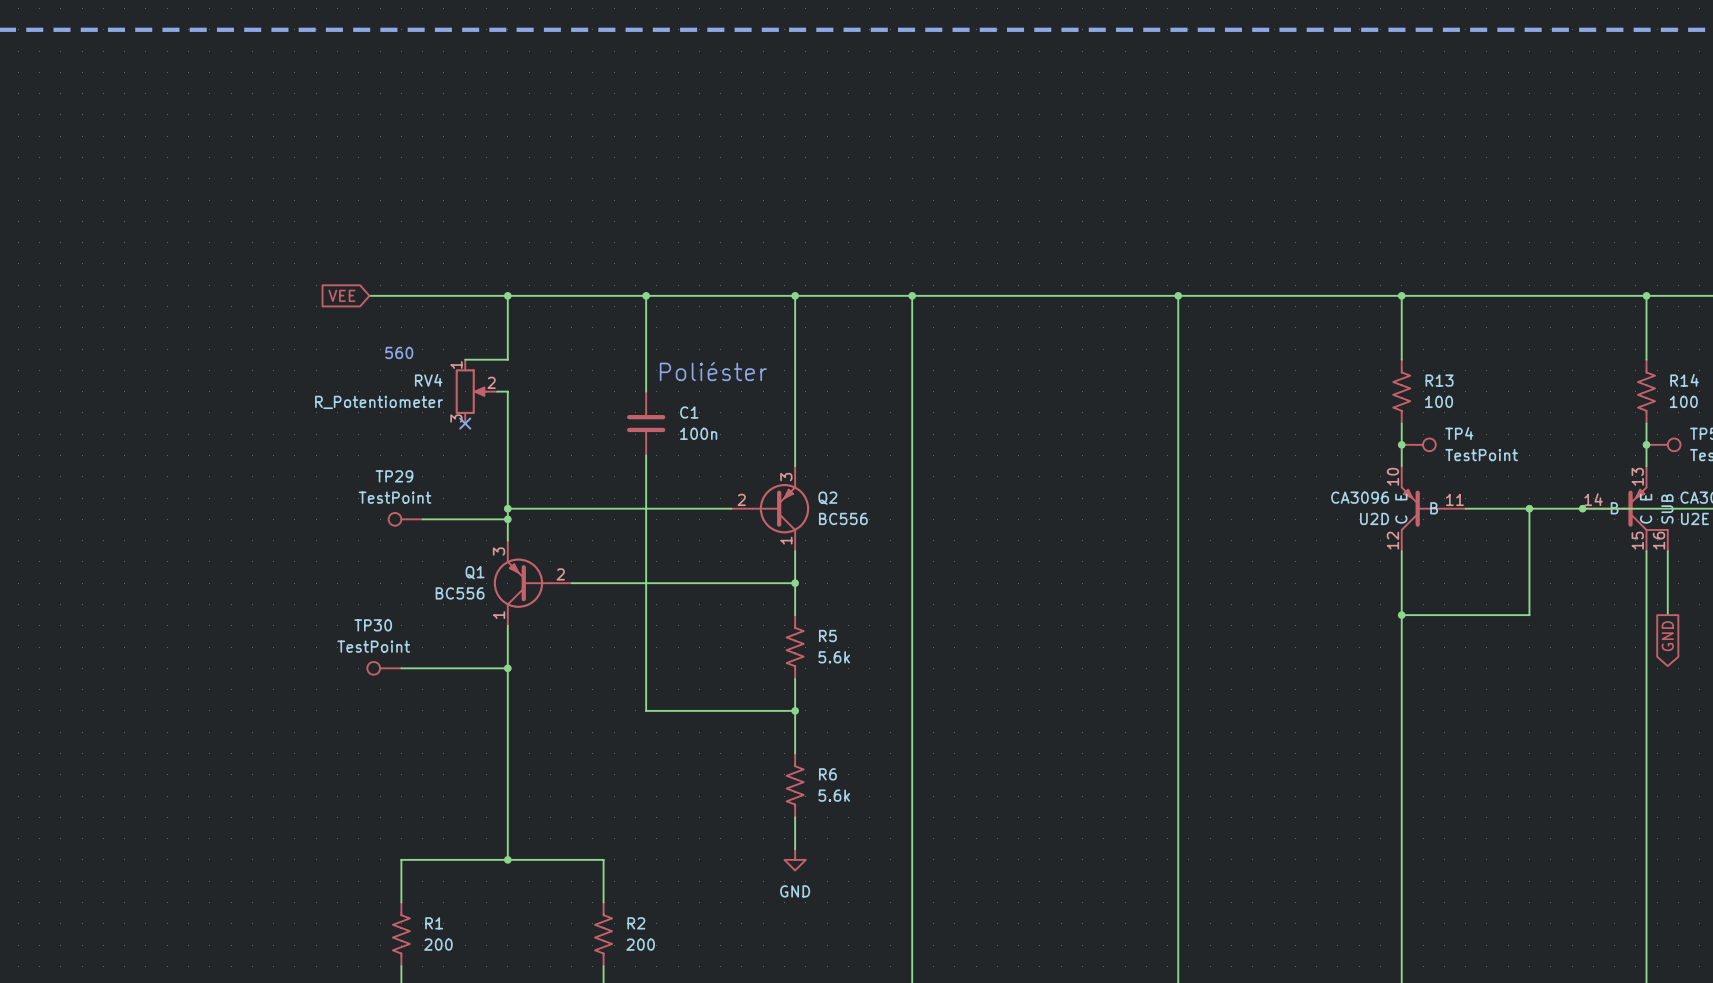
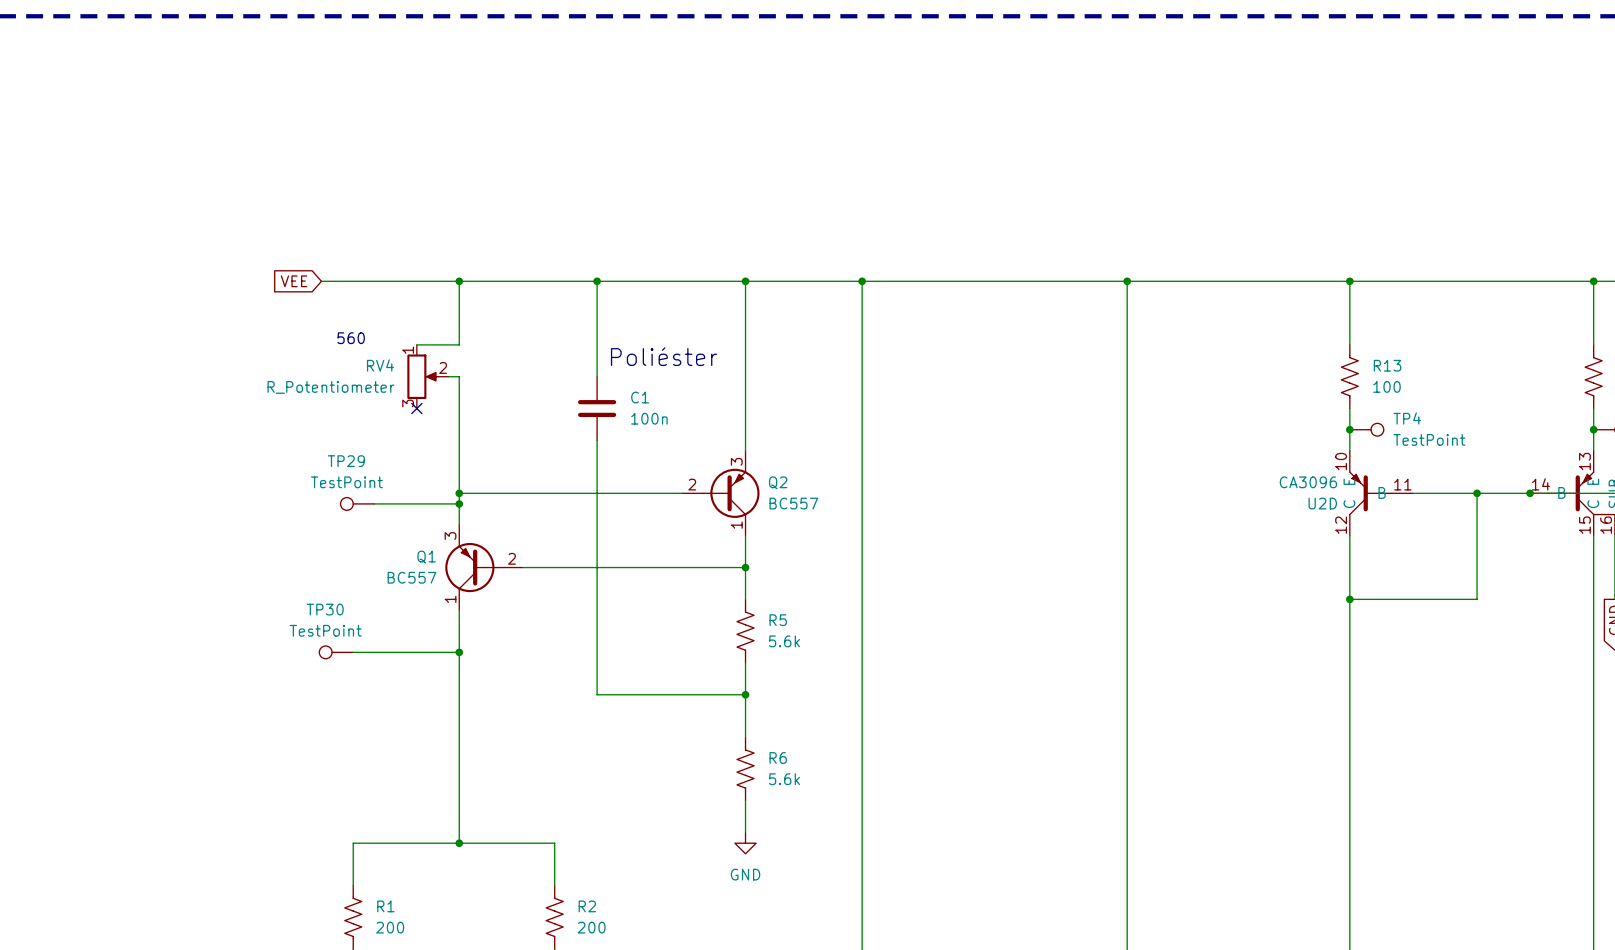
Q2 value: BC556 (843, 518) -> BC557 (793, 503)
Q1 value: BC556 (460, 593) -> BC557 (411, 577)

